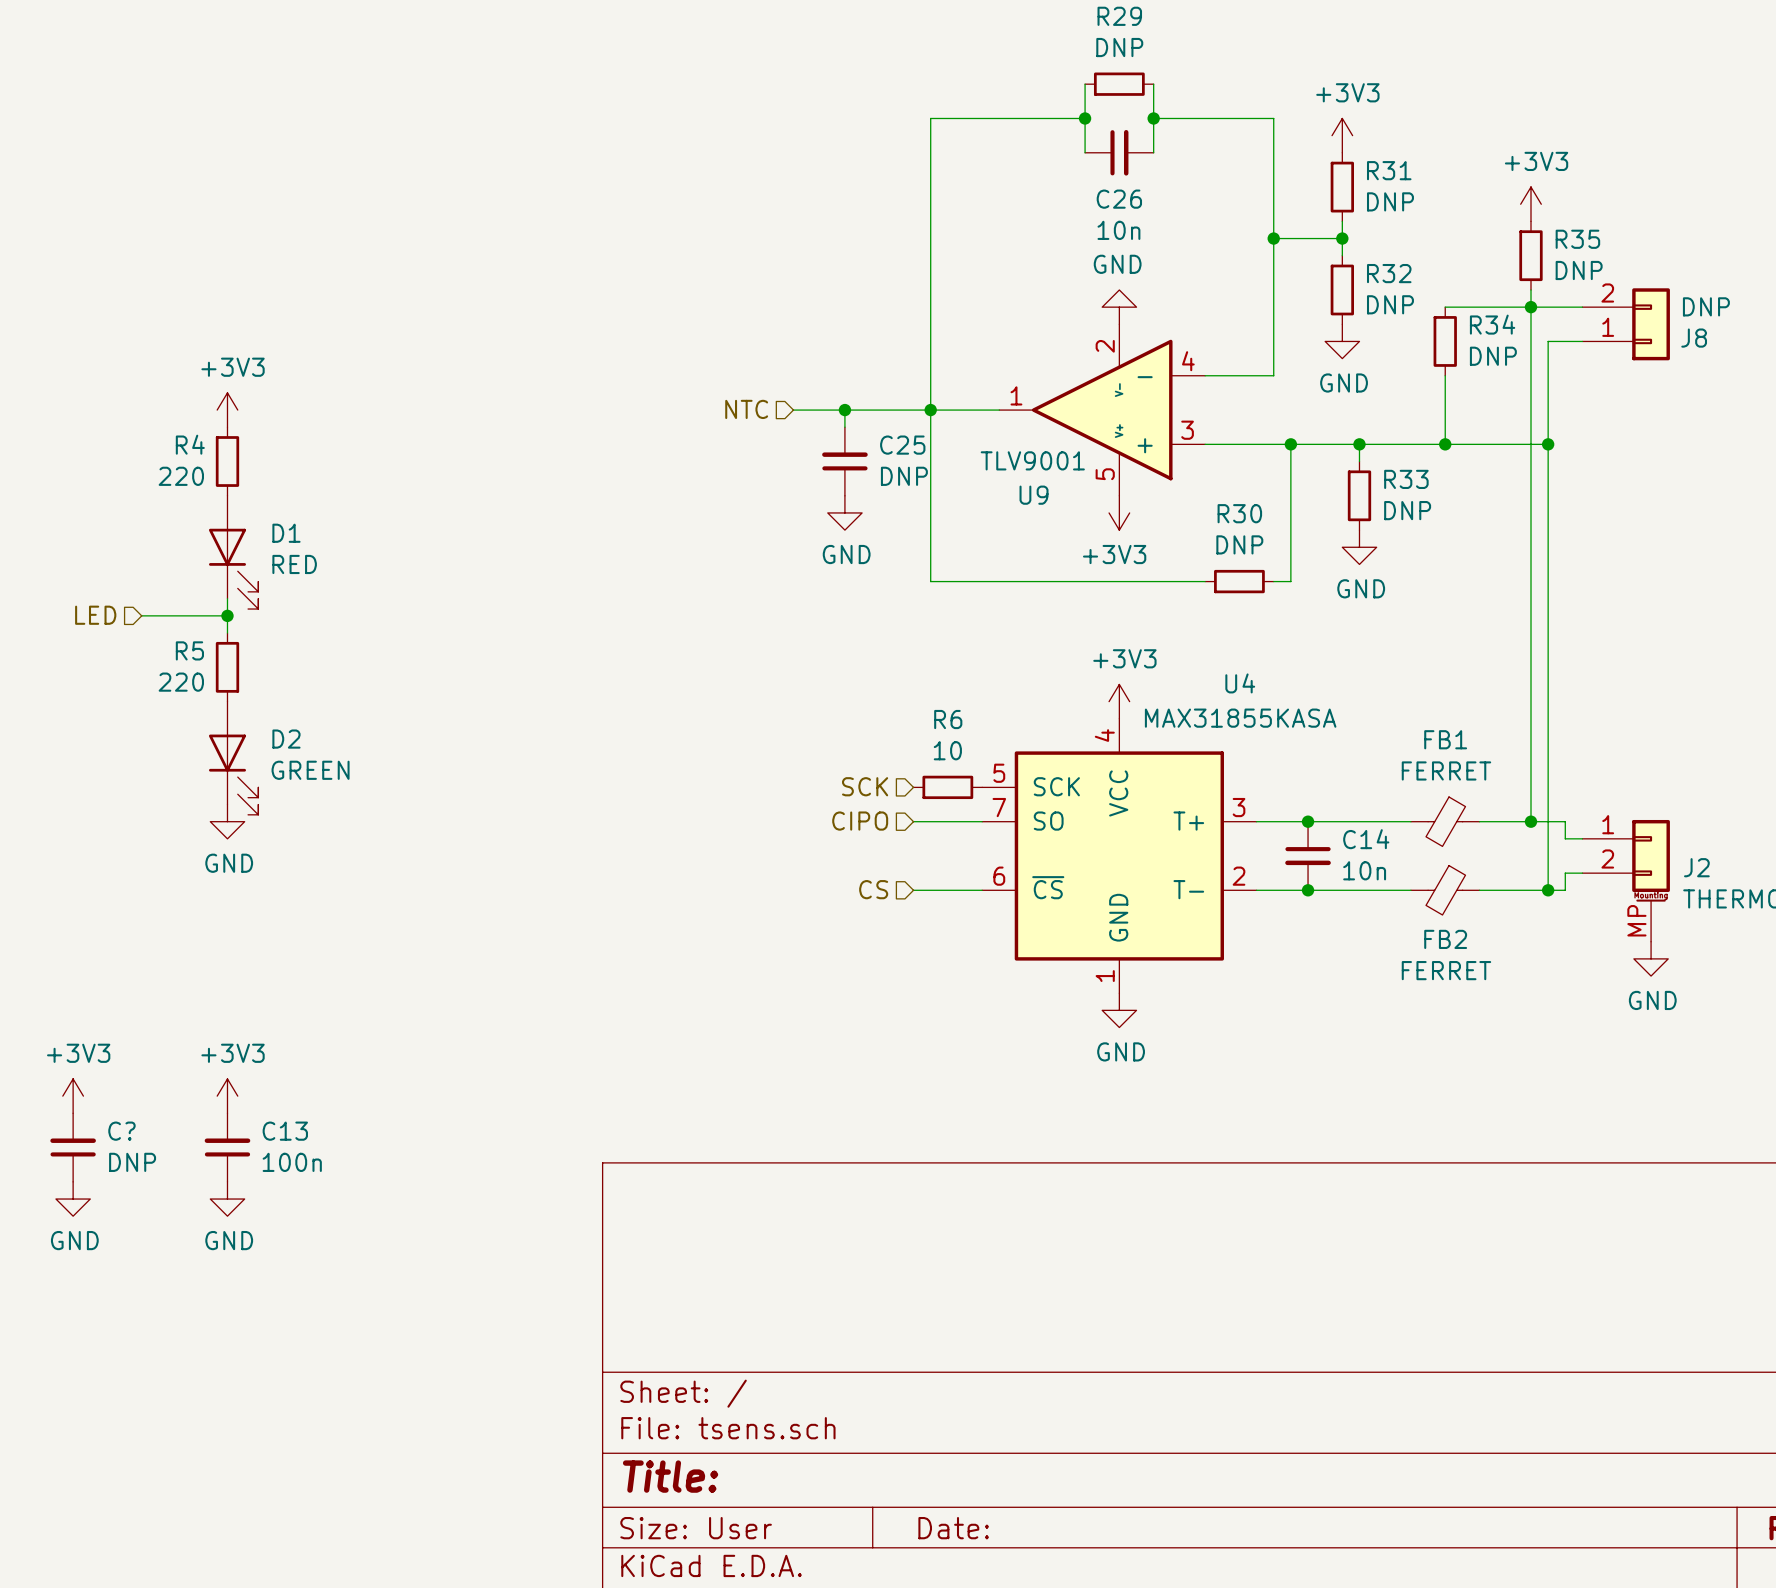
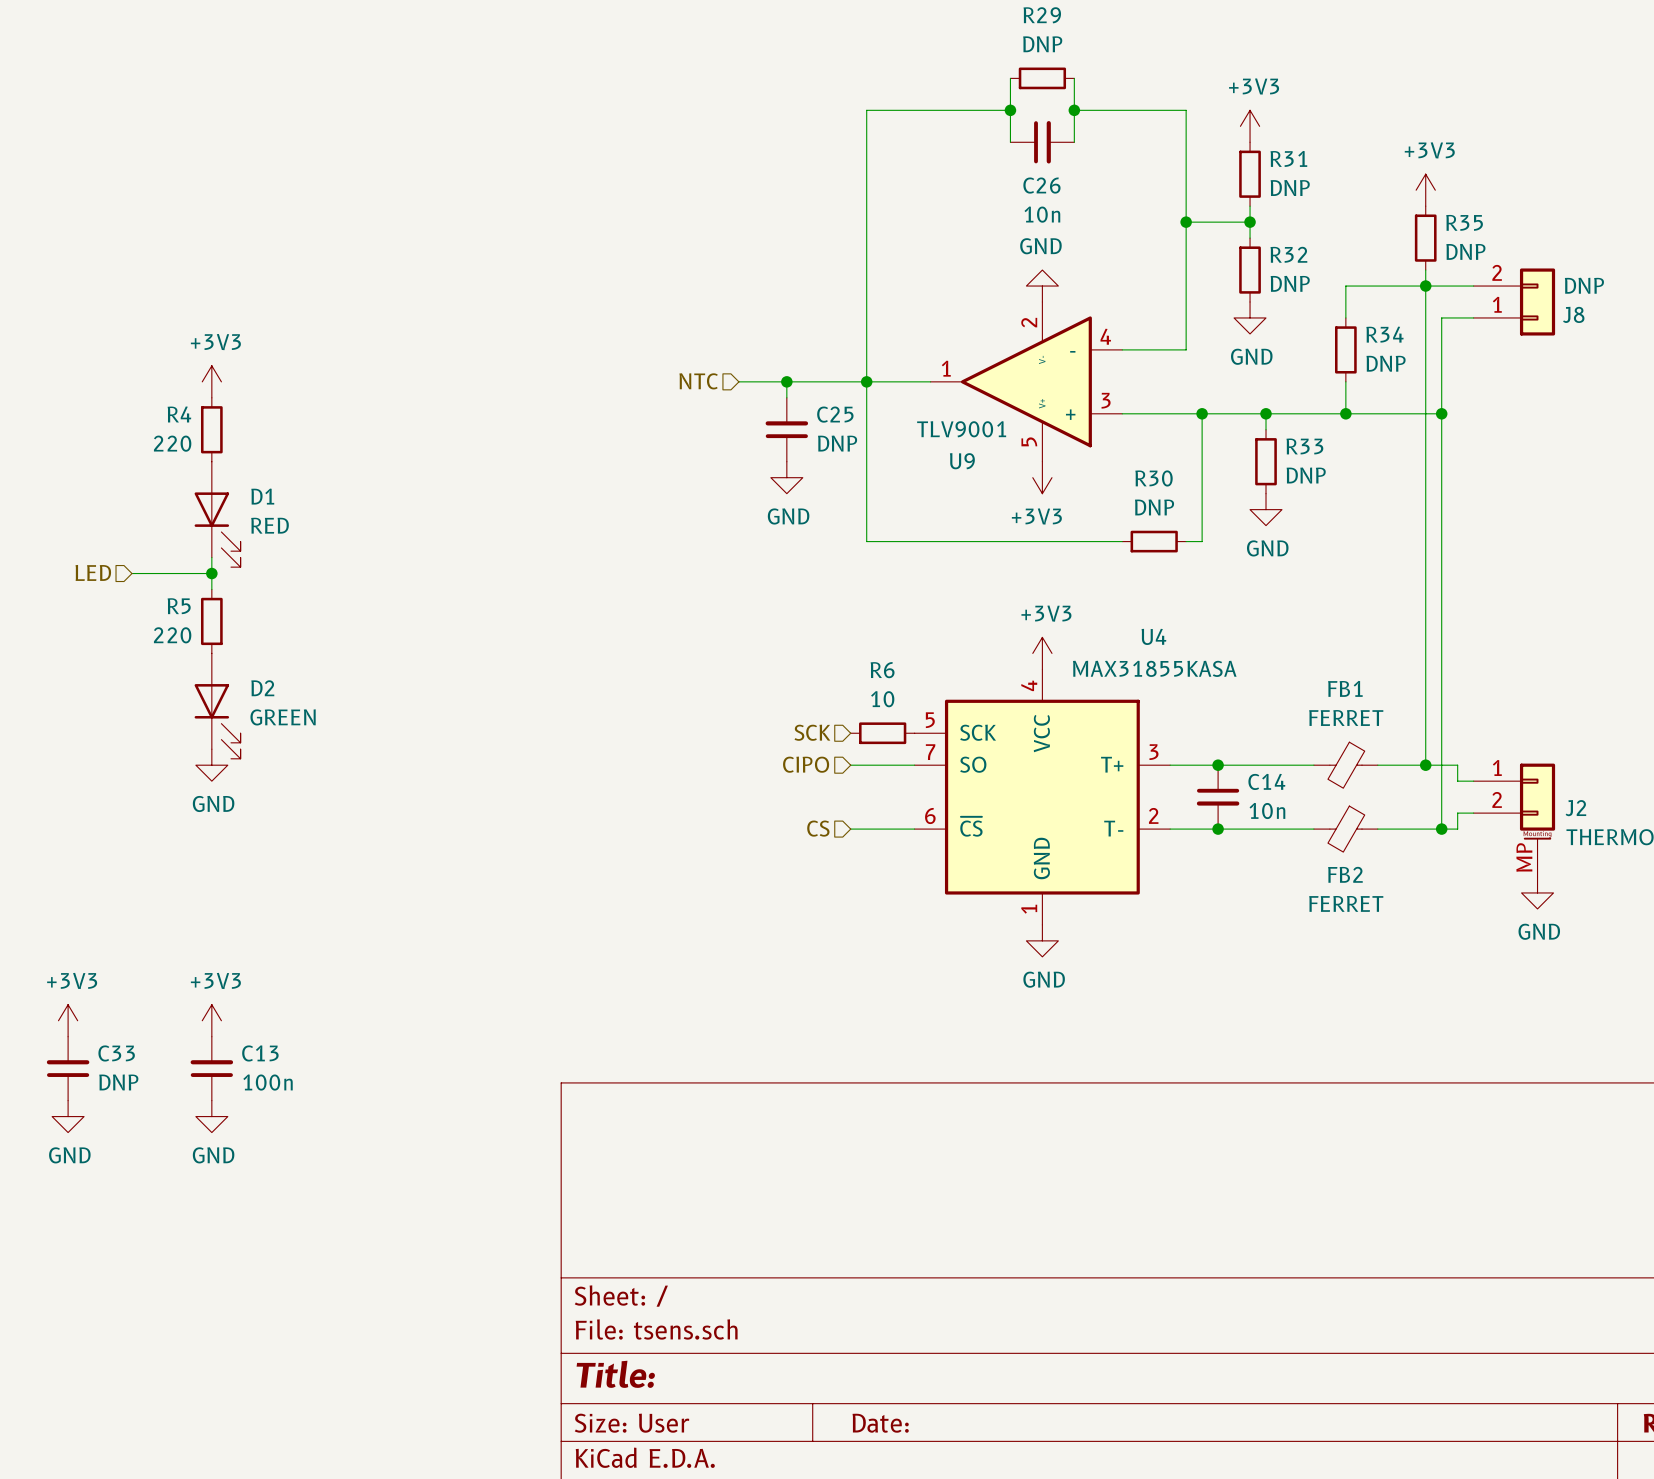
R34 position: (1445, 341) -> (1345, 349)
wire: (1445, 375) (1445, 410) -> (1345, 286) (1345, 317)
C? name: C? (121, 1131) -> C33 (116, 1053)

